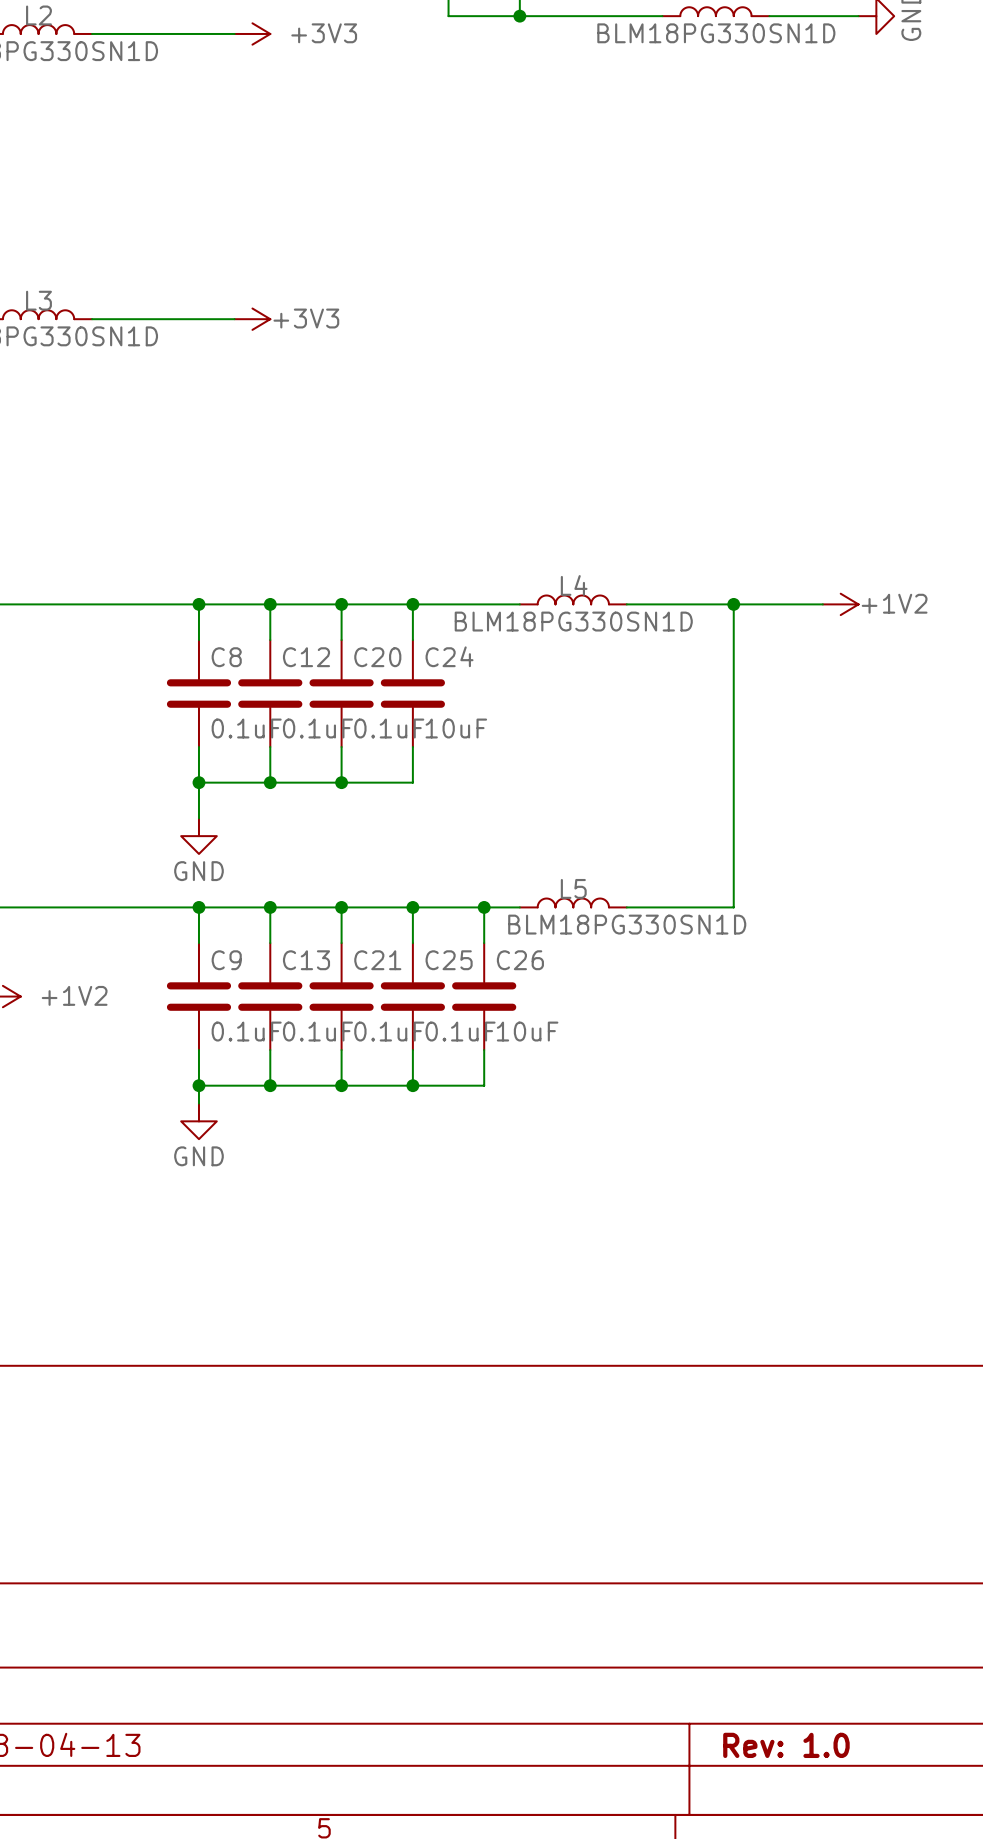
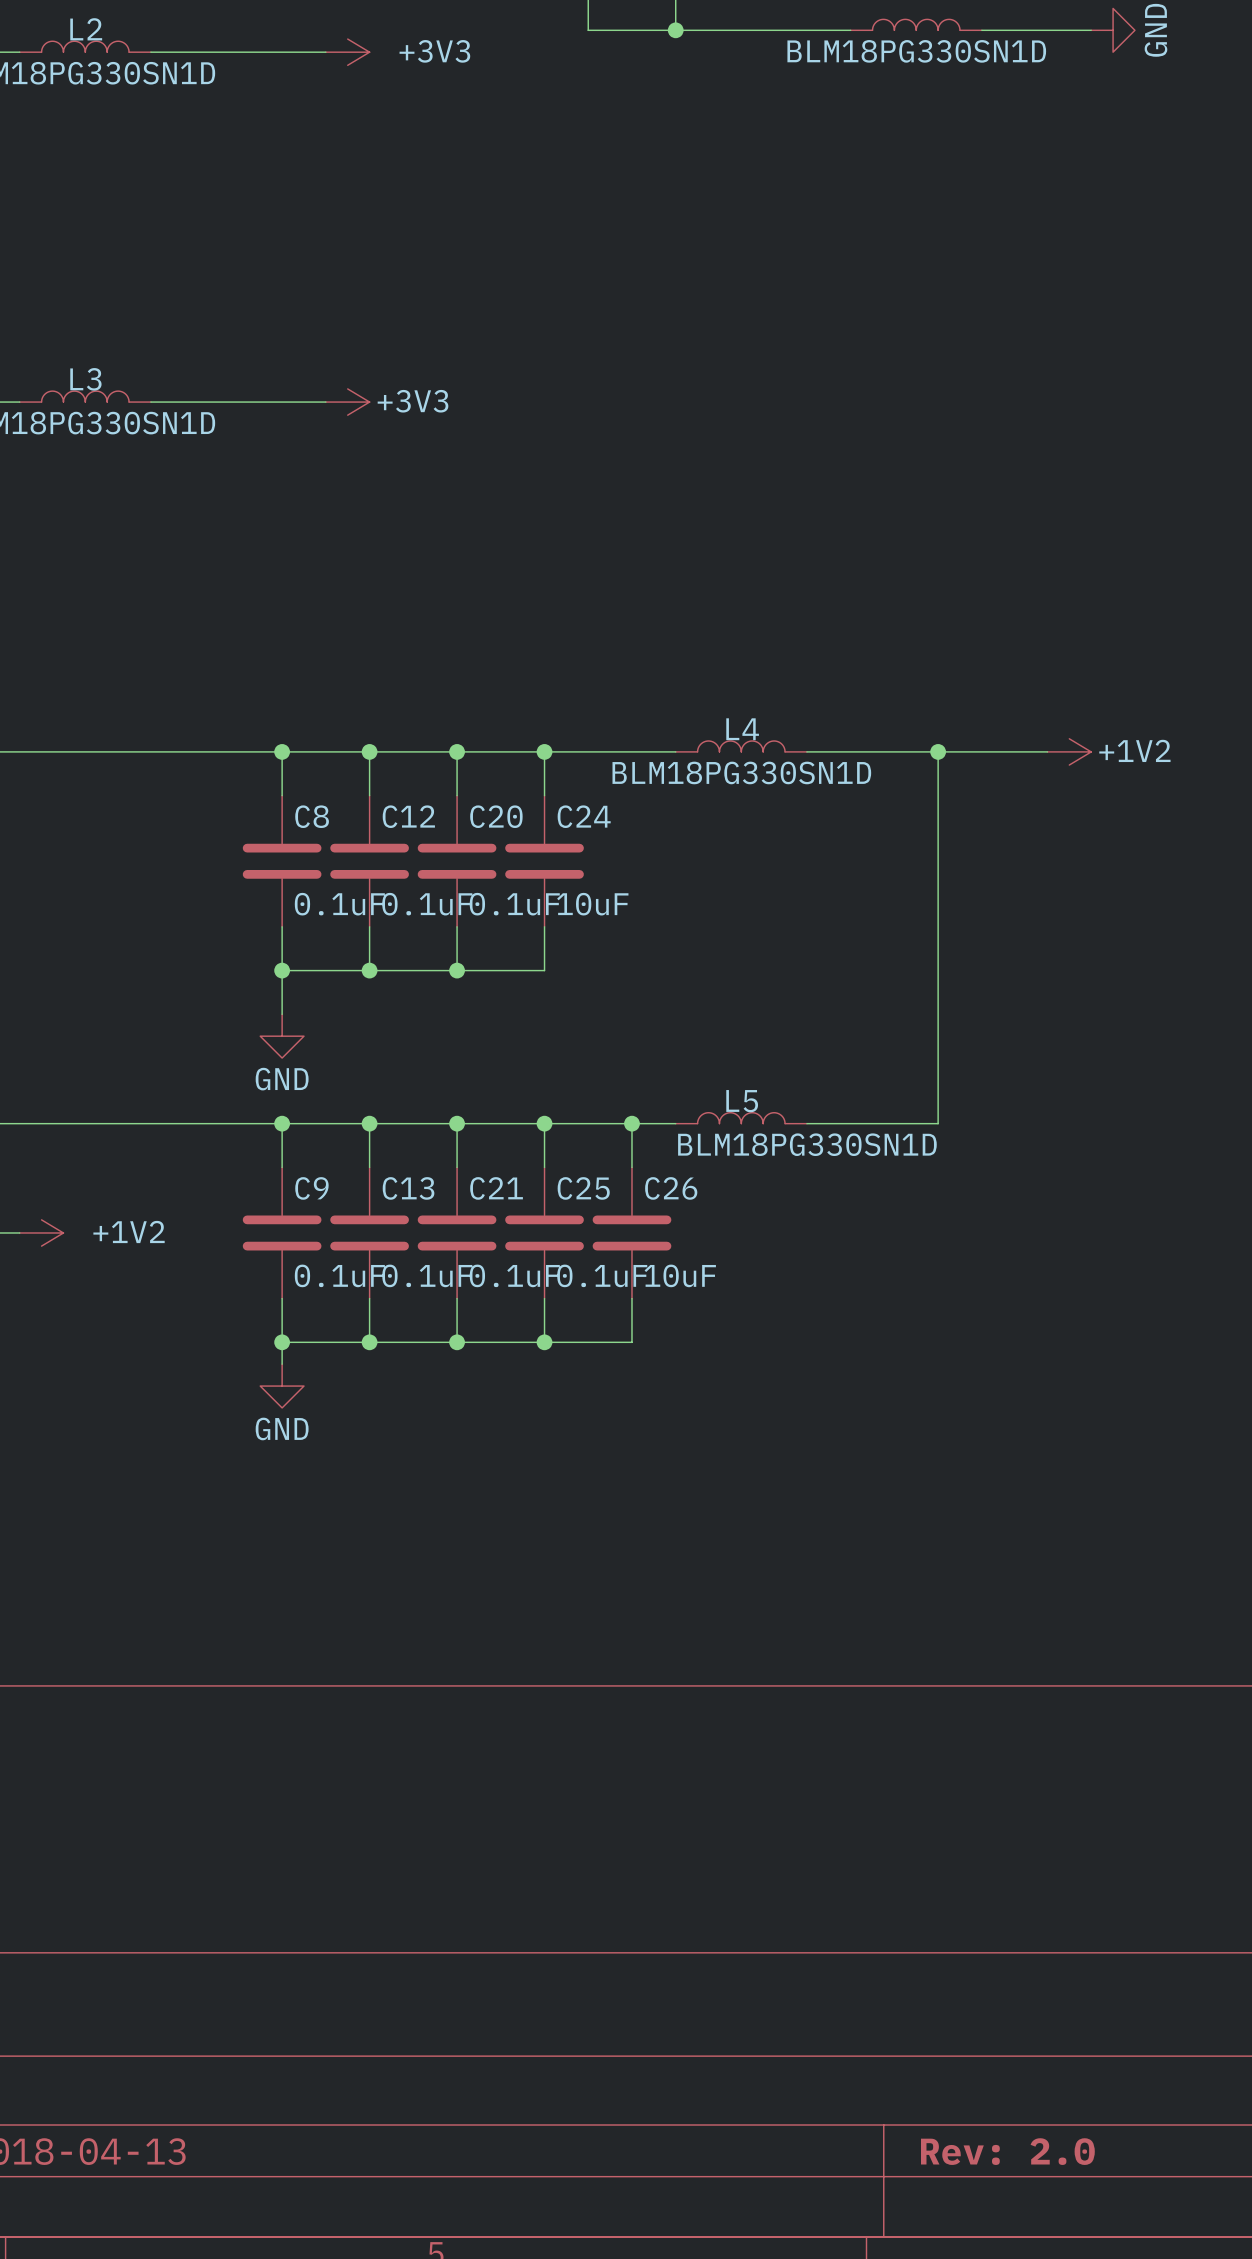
title block: Rev: 1.0 (786, 1745) -> Rev: 2.0 (1007, 2151)

